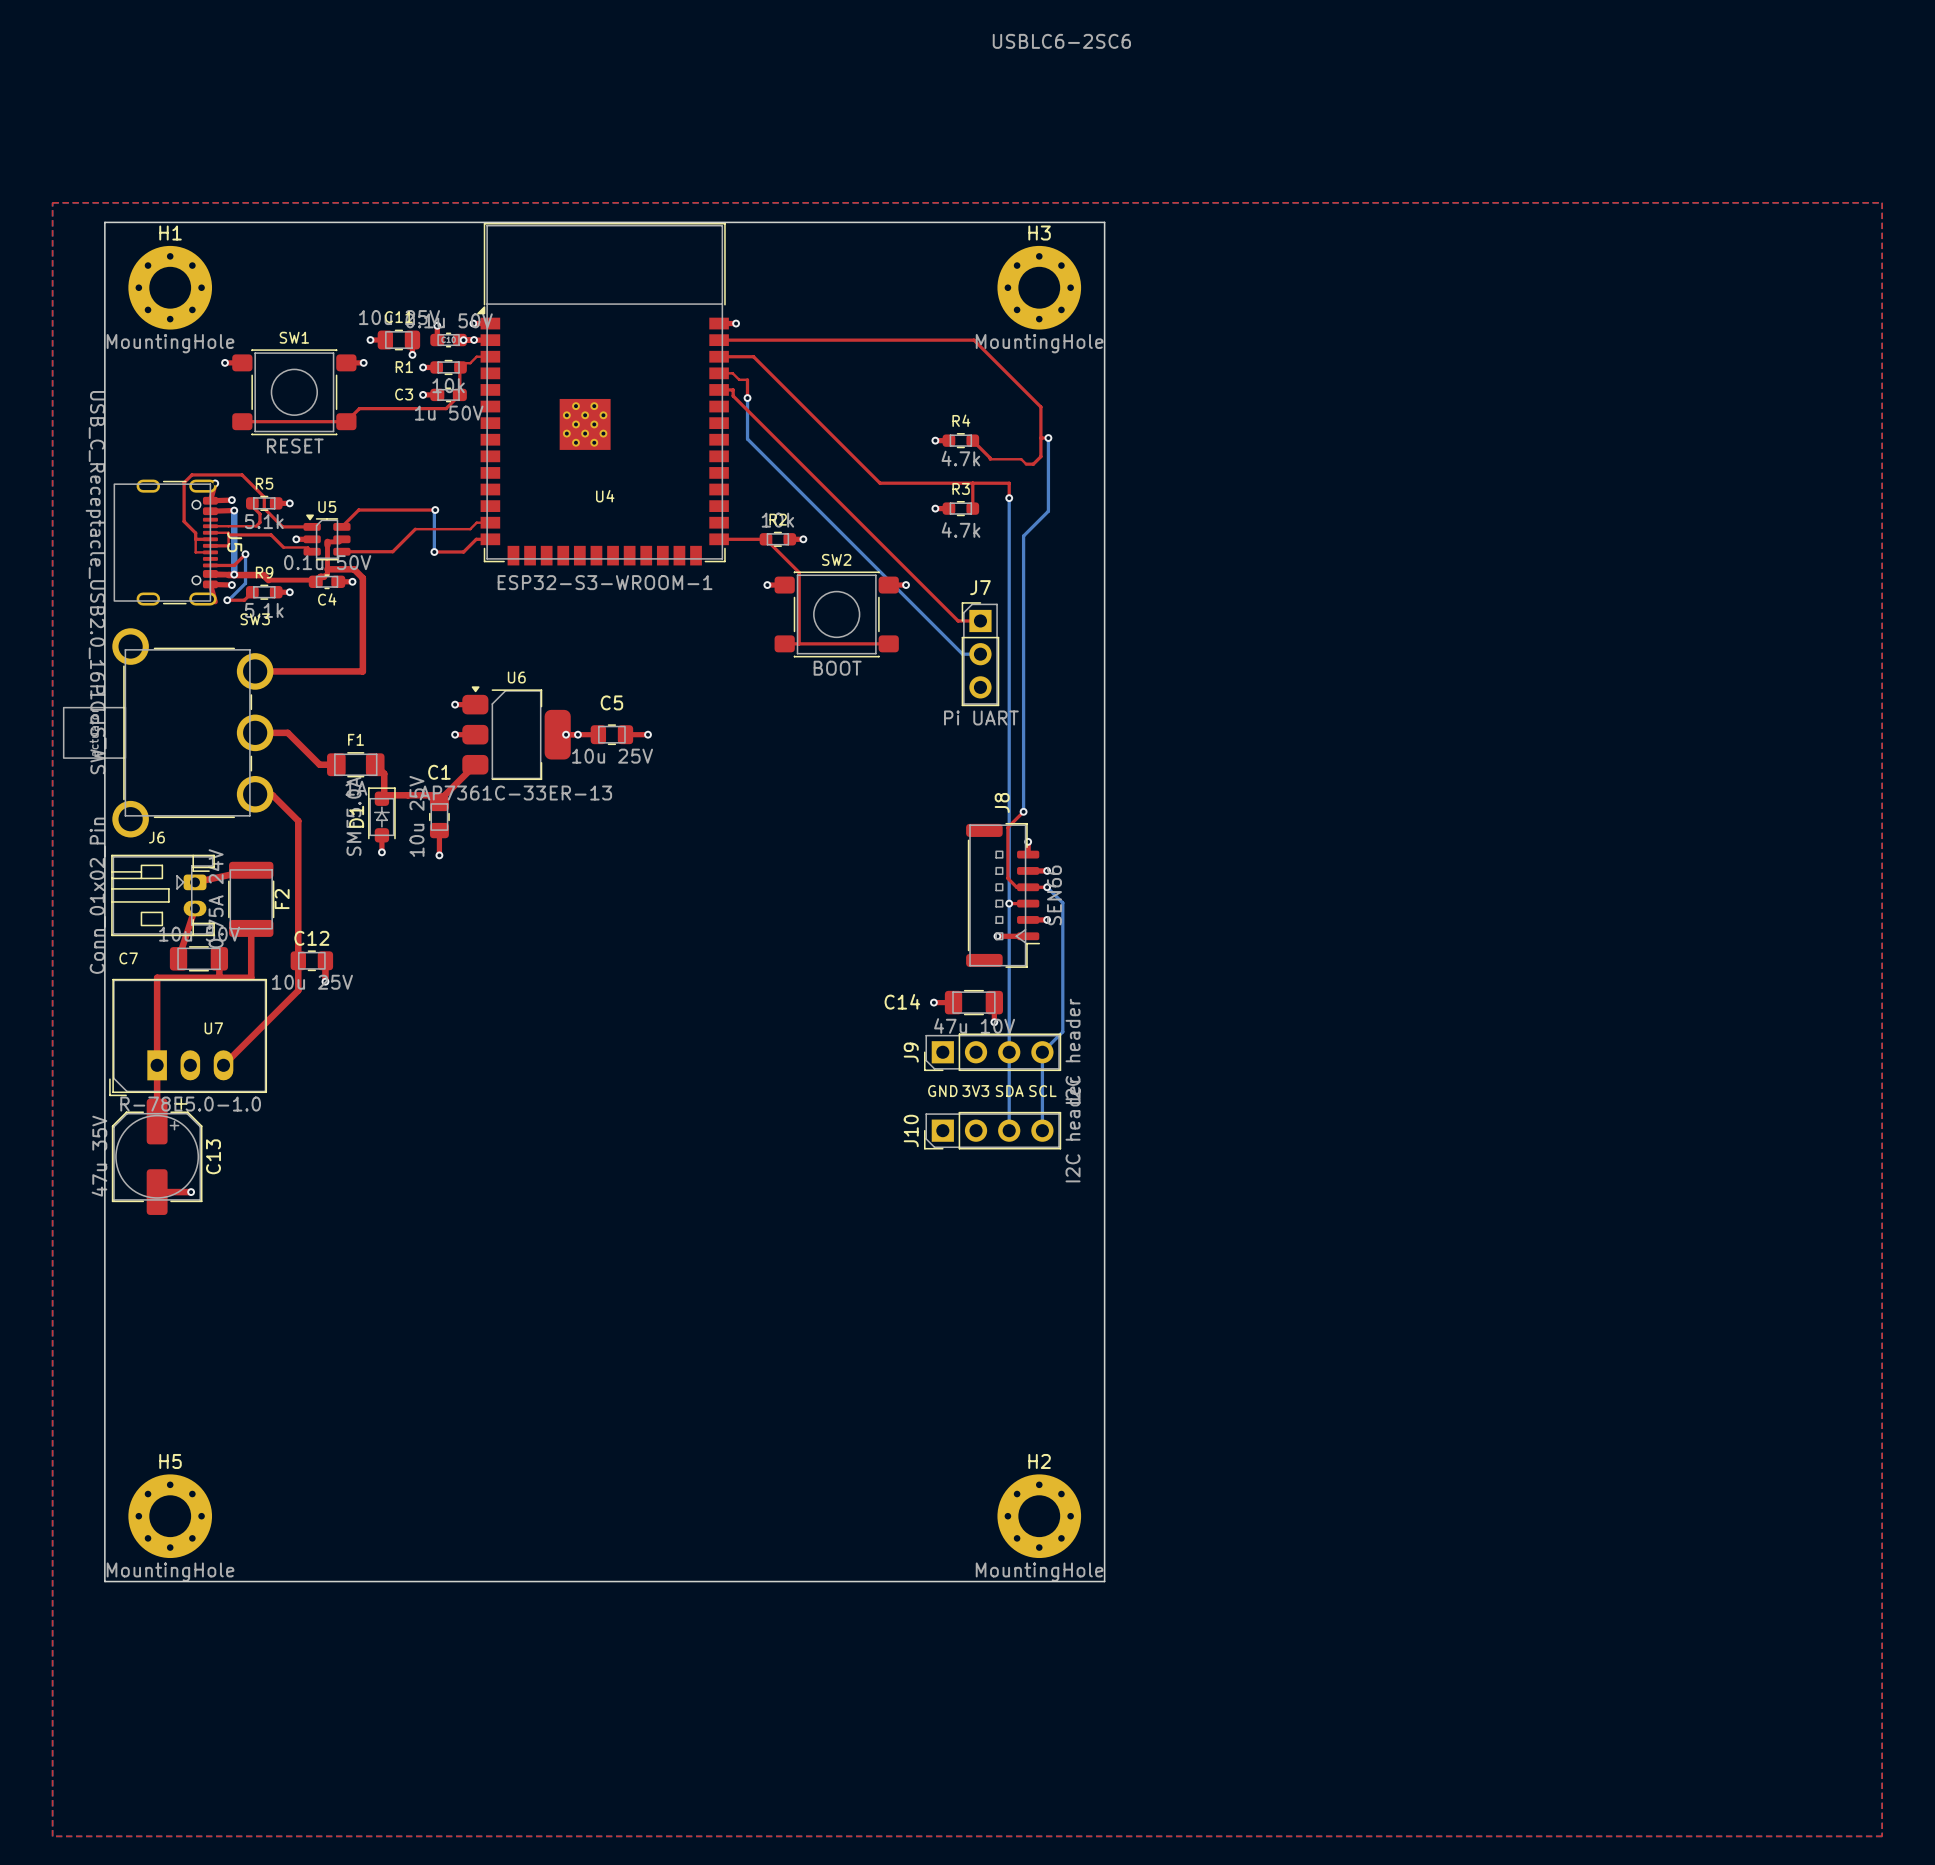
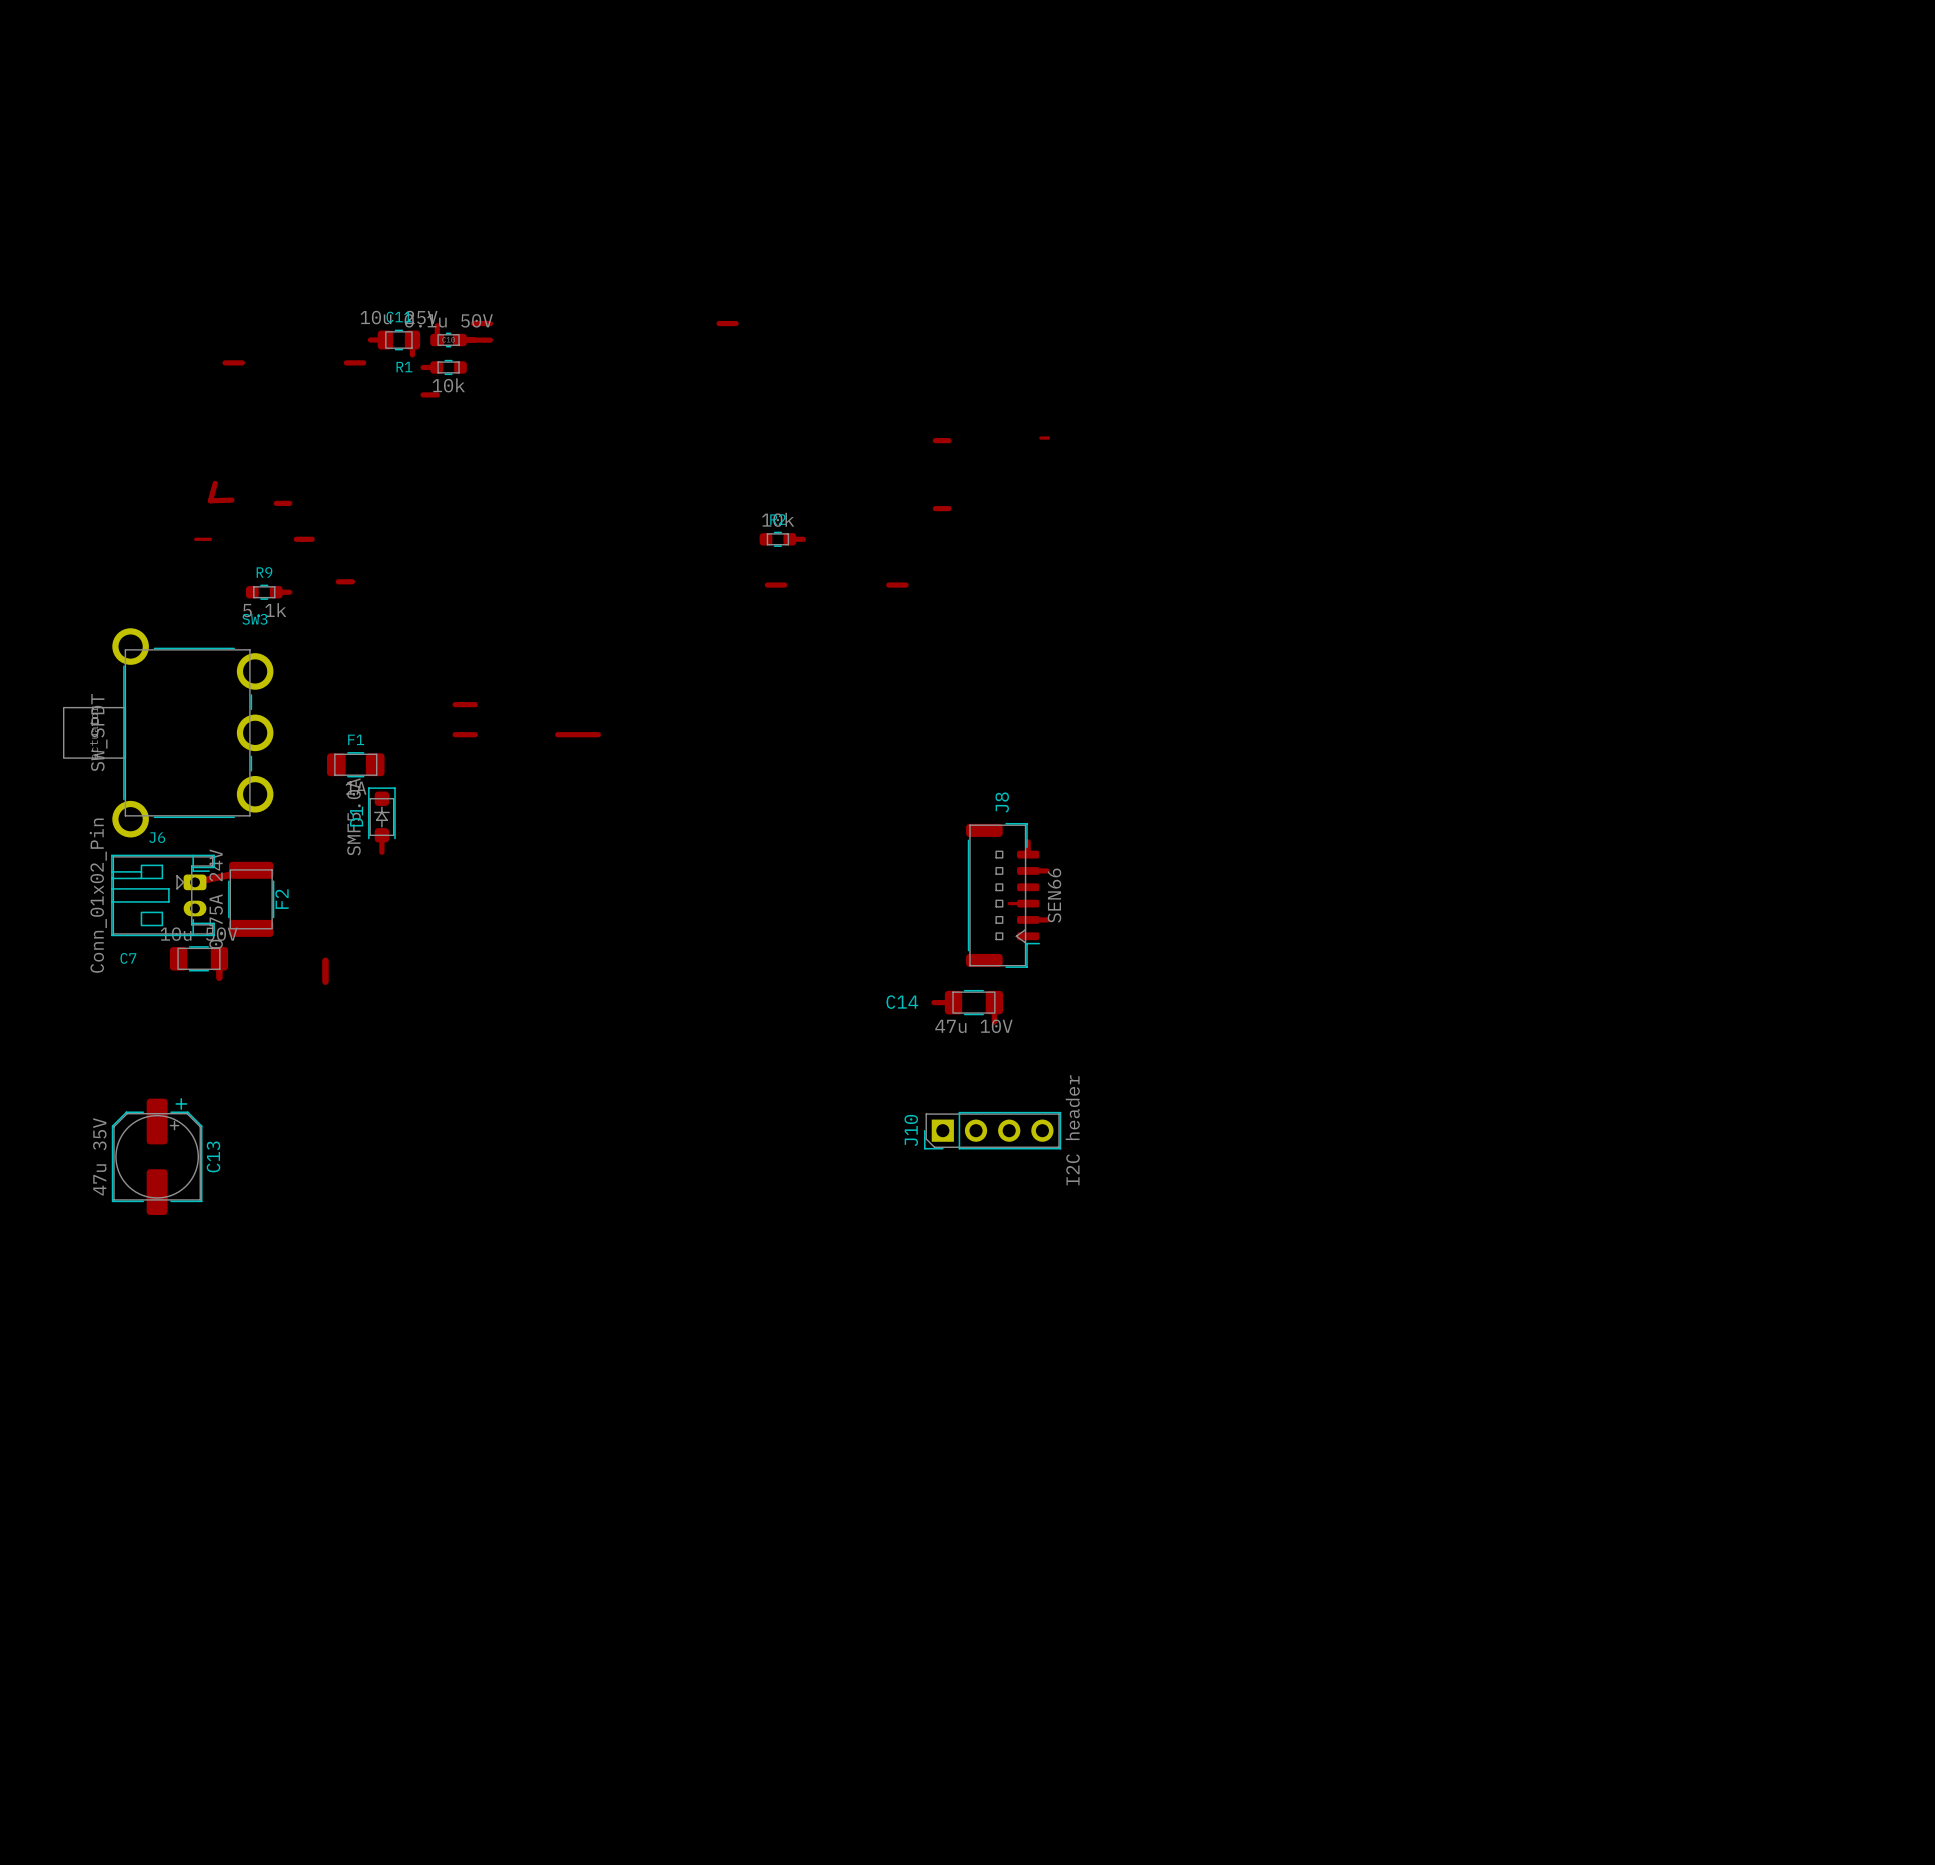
top zone outline: (52, 202) (1882, 202) (1882, 1836) (52, 1836) (52, 202) -> none
board edge: (104, 222) (1104, 222) (1104, 1581) (104, 1581) (104, 222) -> none
H1: MountingHole (170, 287) -> none
H3: MountingHole (1039, 287) -> none
via: (473, 323) -> none
via: (736, 323) -> none
via: (437, 325) -> none
via: (370, 340) -> none
via: (463, 340) -> none
via: (474, 340) -> none
top track: (719, 340) (974, 340) (1040, 407) (1040, 456) (1033, 464) (1026, 464) (1021, 459) (990, 459) (972, 440) -> none
via: (412, 354) -> none
top track: (490, 356) (476, 356) (470, 363) (460, 363) (459, 394) (446, 408) (359, 408) (346, 421) (242, 421) -> none
top track: (719, 356) (753, 356) (880, 483) (972, 483) -> none
via: (225, 362) -> none
via: (363, 362) -> none
via: (423, 367) -> none
top track: (719, 373) (732, 373) (739, 379) (747, 379) (747, 398) -> none
top track: (719, 389) (733, 389) (733, 395) (958, 620) (980, 620) -> none
SW1: RESET (294, 392) -> none
via: (423, 394) -> none
C3: 1u 50V (448, 394) -> none
U4: ESP32-S3-WROOM-1 (603, 394) -> none
bottom track: (747, 398) (747, 439) (962, 654) (980, 654) -> none
via: (747, 398) -> none
bottom track: (1048, 438) (1048, 511) (1023, 536) (1023, 811) -> none
via: (1048, 438) -> none
via: (935, 440) -> none
R4: 4.7k (960, 440) -> none
via: (215, 483) -> none
top track: (972, 483) (1009, 483) (1009, 498) -> none
top track: (972, 483) (972, 508) -> none
bottom track: (1009, 498) (1009, 1130) -> none
via: (1009, 498) -> none
via: (231, 500) -> none
top track: (252, 503) (252, 506) (259, 514) (259, 522) (256, 526) (210, 526) -> none
R5: 5.1k (264, 503) -> none
via: (289, 503) -> none
via: (935, 508) -> none
R3: 4.7k (960, 508) -> none
top track: (234, 510) (210, 511) -> none
bottom track: (234, 510) (234, 574) -> none
via: (234, 510) -> none
top track: (435, 510) (358, 510) (341, 526) -> none
bottom track: (435, 510) (434, 551) -> none
via: (435, 510) -> none
top track: (490, 522) (476, 522) (470, 529) (415, 529) (392, 551) (341, 551) -> none
top track: (312, 526) (282, 526) (264, 508) (264, 497) (242, 474) (191, 474) (184, 482) (184, 521) (195, 533) (195, 552) (210, 552) -> none
top track: (210, 532) (228, 532) (228, 545) (210, 545) -> none
top track: (228, 534) (271, 534) (283, 547) (307, 547) (312, 551) -> none
U5: USBLC6-2SC6 (327, 537) -> none
via: (296, 539) -> none
top track: (341, 539) (339, 541) (327, 541) (327, 573) (315, 581) (314, 580) (268, 580) (263, 575) (210, 573) (234, 574) -> none
top track: (490, 539) (476, 539) (463, 551) (434, 551) -> none
top track: (719, 539) (765, 539) (799, 572) (799, 643) -> none
via: (803, 539) -> none
J5: USB_C_Receptacle_USB2.0_16P (165, 542) -> none
via: (434, 551) -> none
top track: (245, 554) (234, 565) (210, 565) -> none
bottom track: (245, 554) (245, 583) (227, 600) -> none
via: (245, 554) -> none
top track: (327, 569) (354, 569) (362, 578) (362, 671) (255, 671) -> none
via: (234, 574) -> none
C4: 0.1u 50V (327, 581) -> none
via: (352, 581) -> none
top track: (231, 585) (210, 584) (215, 601) -> none
via: (231, 585) -> none
via: (767, 585) -> none
via: (906, 585) -> none
top track: (252, 592) (244, 600) (227, 600) -> none
via: (289, 592) -> none
via: (227, 600) -> none
SW2: BOOT (836, 614) -> none
top track: (784, 643) (888, 643) -> none
J7: Pi UART (980, 654) -> none
via: (455, 704) -> none
top track: (255, 732) (287, 732) (319, 764) (336, 764) -> none
U6: AP7361C-33ER-13 (516, 733) -> none
via: (455, 734) -> none
via: (566, 734) -> none
via: (577, 734) -> none
C5: 10u 25V (611, 734) -> none
top track: (625, 734) (647, 734) -> none
via: (647, 734) -> none
top track: (375, 764) (384, 773) (384, 795) -> none
top track: (475, 764) (444, 795) (439, 803) (438, 795) (384, 795) -> none
top track: (255, 794) (272, 795) (298, 820) (298, 990) (223, 1065) -> none
top track: (1023, 811) (1007, 827) (1007, 878) (1016, 887) (1047, 887) -> none
via: (1023, 811) -> none
C1: 10u 25V (439, 817) -> none
top track: (439, 830) (439, 855) -> none
via: (1028, 841) -> none
via: (381, 852) -> none
via: (439, 855) -> none
via: (1047, 870) -> none
bottom track: (1047, 887) (1062, 902) (1062, 1031) (1042, 1052) (1042, 1130) -> none
via: (1047, 887) -> none
via: (1009, 903) -> none
top track: (195, 908) (178, 958) -> none
via: (1047, 919) -> none
top track: (251, 928) (251, 977) (157, 977) (157, 1121) -> none
top track: (997, 936) (1028, 936) -> none
via: (997, 936) -> none
C12: 10u 25V (311, 960) -> none
via: (325, 981) -> none
via: (933, 1002) -> none
via: (994, 1022) -> none
U7: R-78E5.0-1.0 (188, 1037) -> none
J9: I2C header (992, 1052) -> none
text: GND (942, 1091) -> none
text: 3V3 (975, 1091) -> none
text: SDA (1009, 1091) -> none
text: SCL (1042, 1091) -> none
top track: (157, 1192) (191, 1192) -> none
via: (191, 1192) -> none
H5: MountingHole (170, 1516) -> none
H2: MountingHole (1039, 1516) -> none

